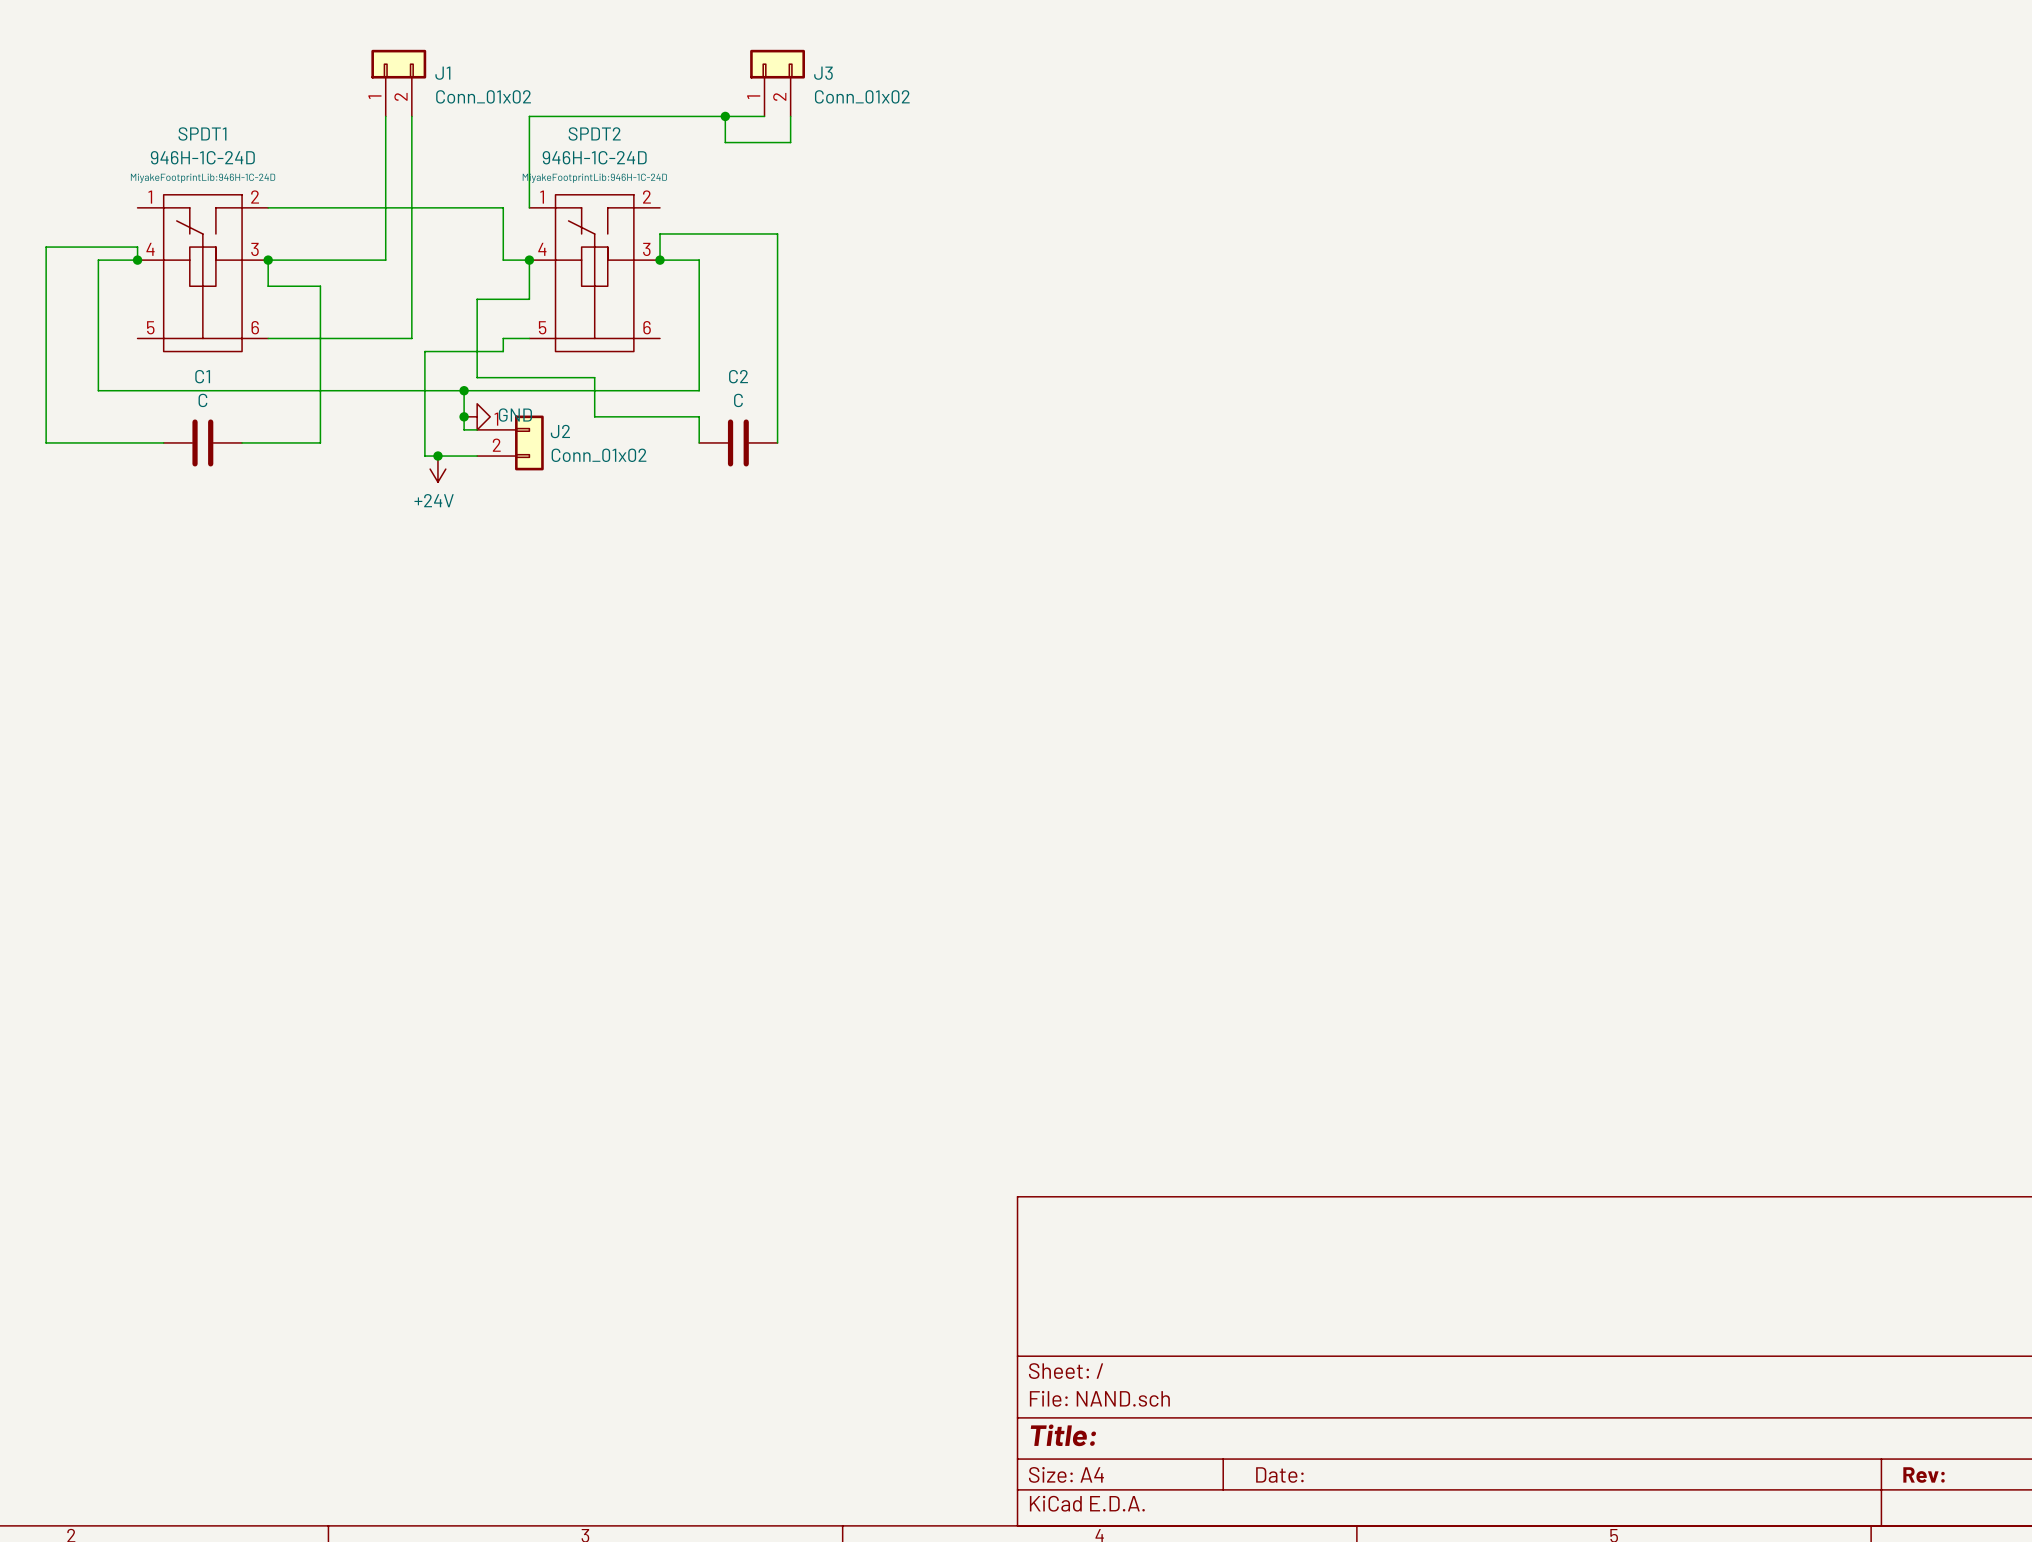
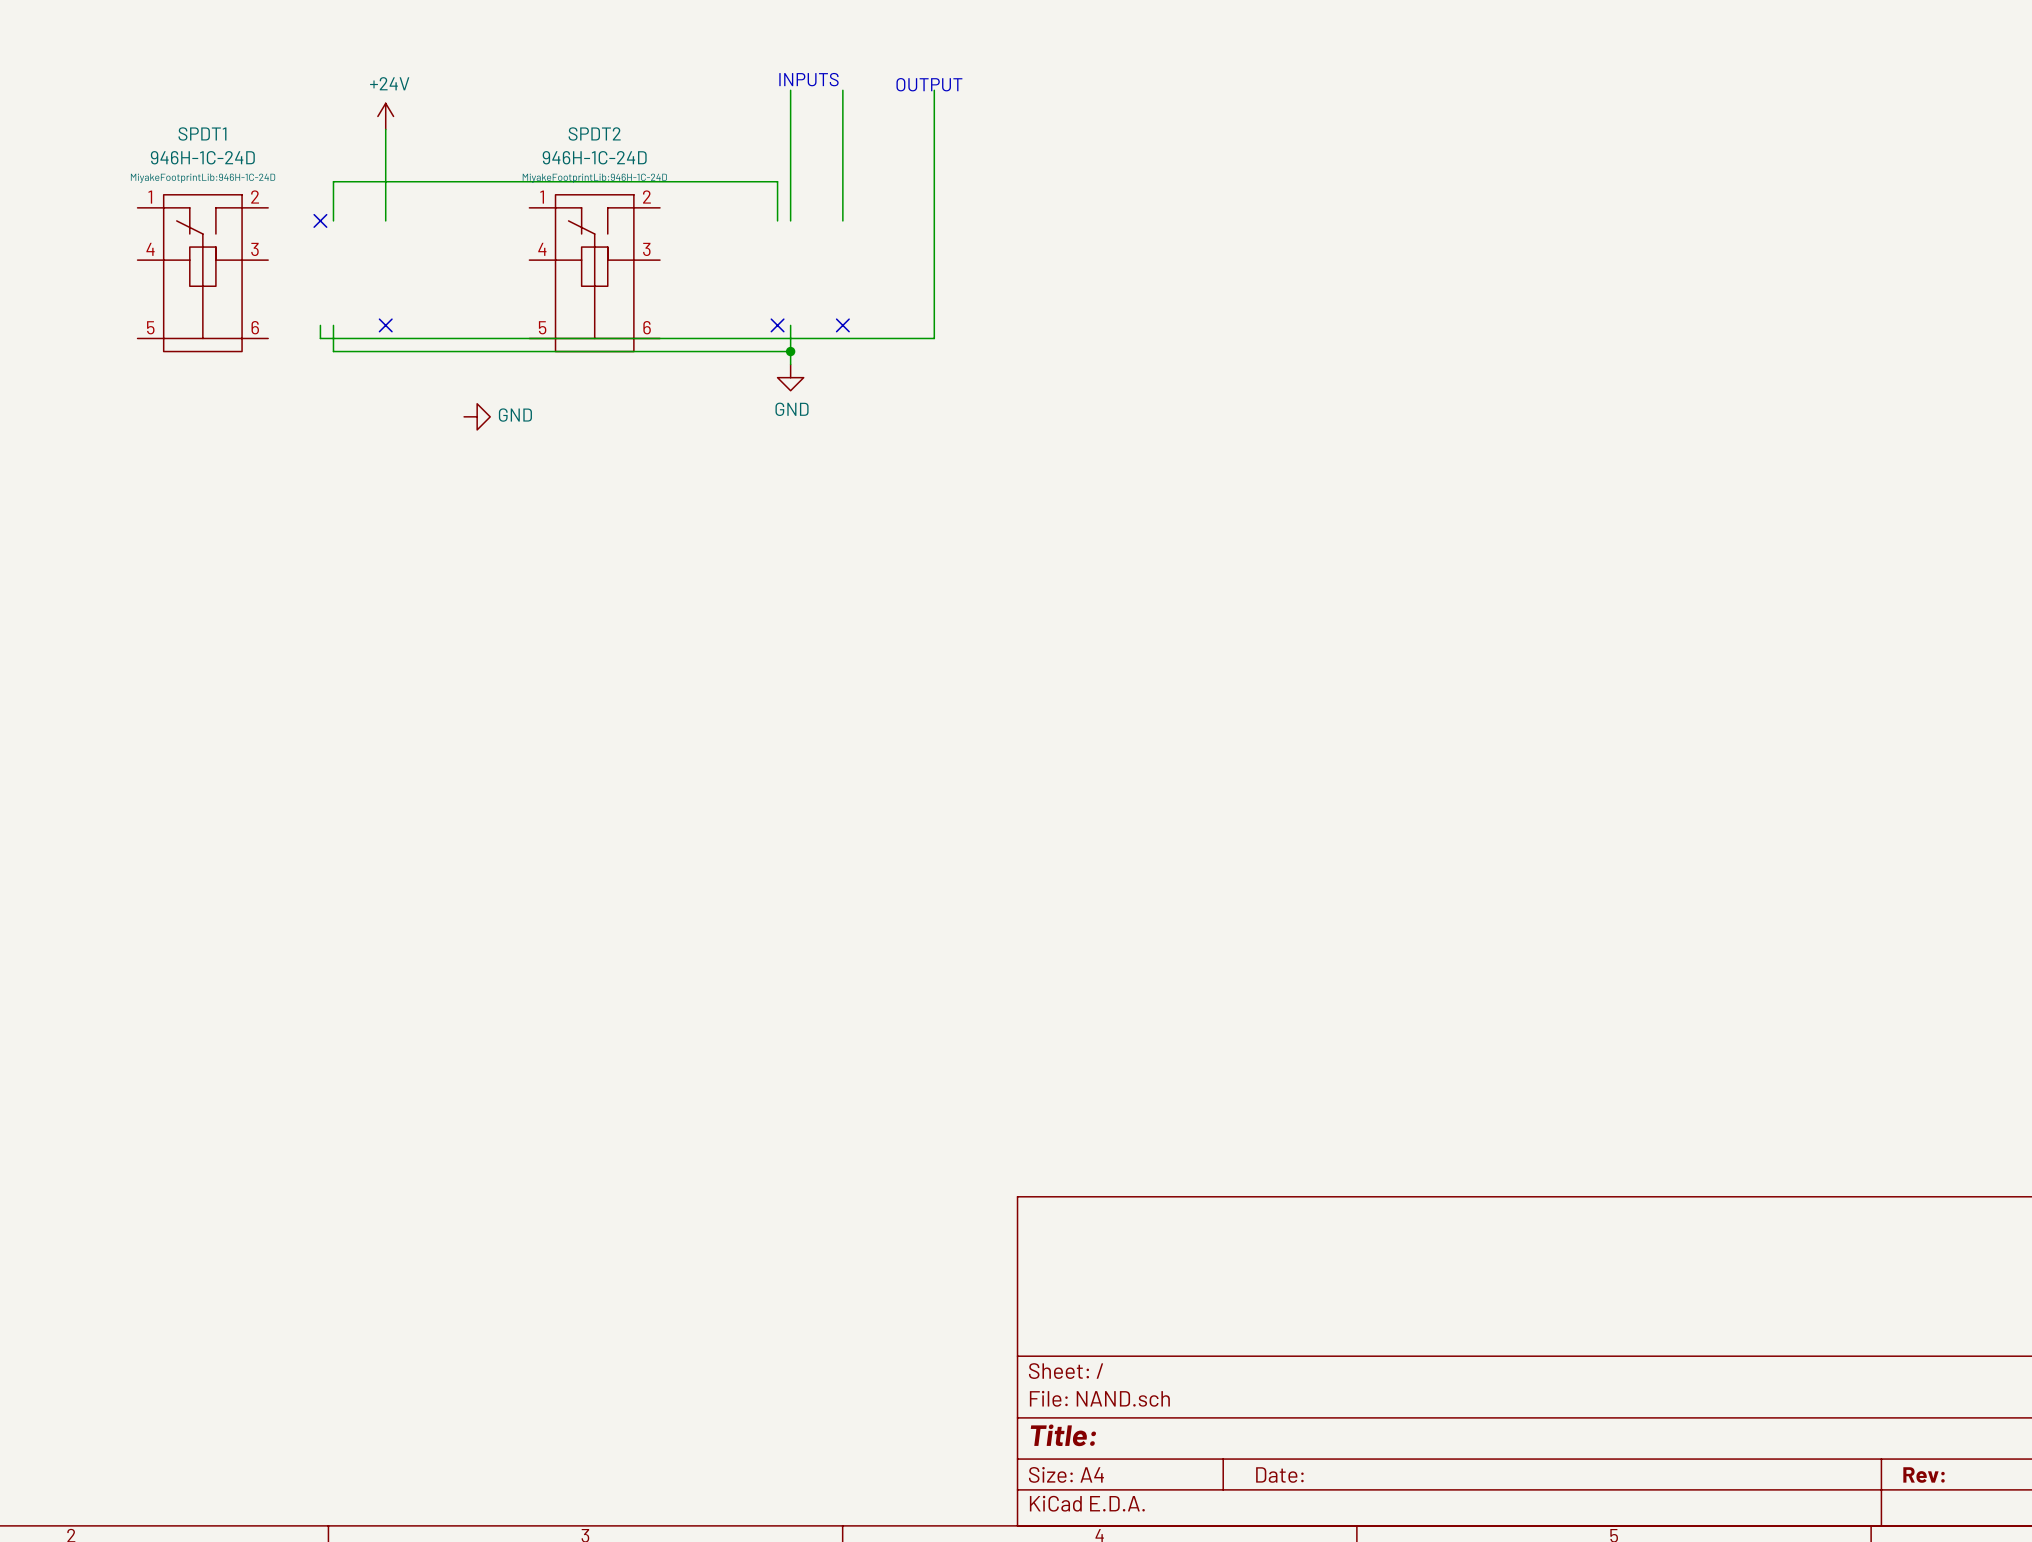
text: none -> INPUTS (808, 79)
J1: Conn_01x02 (398, 83) -> none
J3: Conn_01x02 (777, 83) -> none
text: none -> OUTPUT (929, 84)
wire: none -> (842, 90) (842, 220)
wire: none -> (934, 90) (934, 338) (529, 338)
power symbol: none -> +24V (385, 116)
wire: (411, 116) (411, 338) -> none
wire: (725, 116) (725, 142) (790, 142) -> (790, 220) (790, 142)
junction: (725, 116) -> none
wire: (764, 116) (529, 116) (529, 207) -> none
wire: (268, 207) (503, 207) (503, 260) (529, 260) (529, 299) (477, 299) (477, 377) (594, 377) (594, 416) (699, 416) (699, 442) -> none
no-connect mark: none -> (320, 220)
wire: none -> (333, 220) (333, 181) (777, 181) (777, 220)
wire: (385, 220) (385, 260) (268, 260) (268, 286) (320, 286) (320, 325) -> none
junction: (137, 260) -> none
junction: (268, 260) -> none
junction: (529, 260) -> none
junction: (660, 260) -> none
no-connect mark: none -> (385, 325)
no-connect mark: none -> (777, 325)
wire: none -> (790, 325) (790, 364)
no-connect mark: none -> (842, 325)
wire: (268, 338) (320, 338) (320, 442) (242, 442) -> none
wire: (503, 338) (503, 351) -> (503, 338) (411, 338)
wire: (424, 351) (424, 456) (477, 456) -> (424, 351) (333, 351) (333, 325)
wire: none -> (503, 351) (790, 351)
junction: none -> (790, 351)
power symbol: none -> GND (790, 377)
wire: (464, 390) (464, 429) (477, 429) -> none
junction: (464, 390) -> none
junction: (464, 416) -> none
wire: (163, 442) (46, 442) (46, 247) (137, 247) (137, 260) (98, 260) (98, 390) (699, 390) (699, 260) (660, 260) (660, 233) (777, 233) (777, 442) -> none
C1: C (202, 442) -> none
J2: Conn_01x02 (510, 442) -> none
C2: C (738, 442) -> none
junction: (437, 456) -> none
power symbol: +24V (437, 469) -> none

